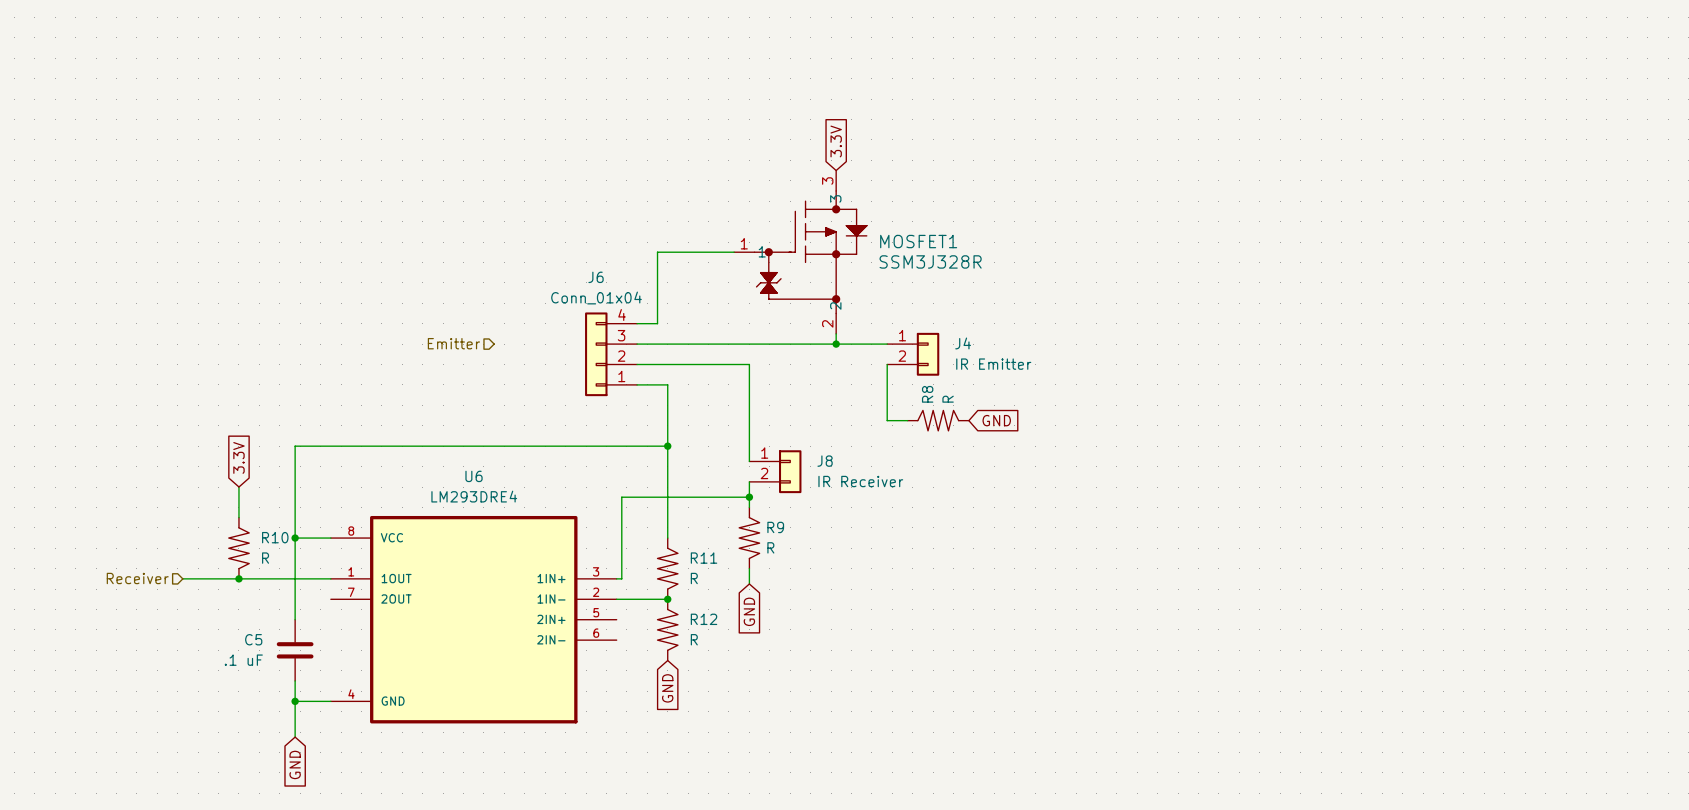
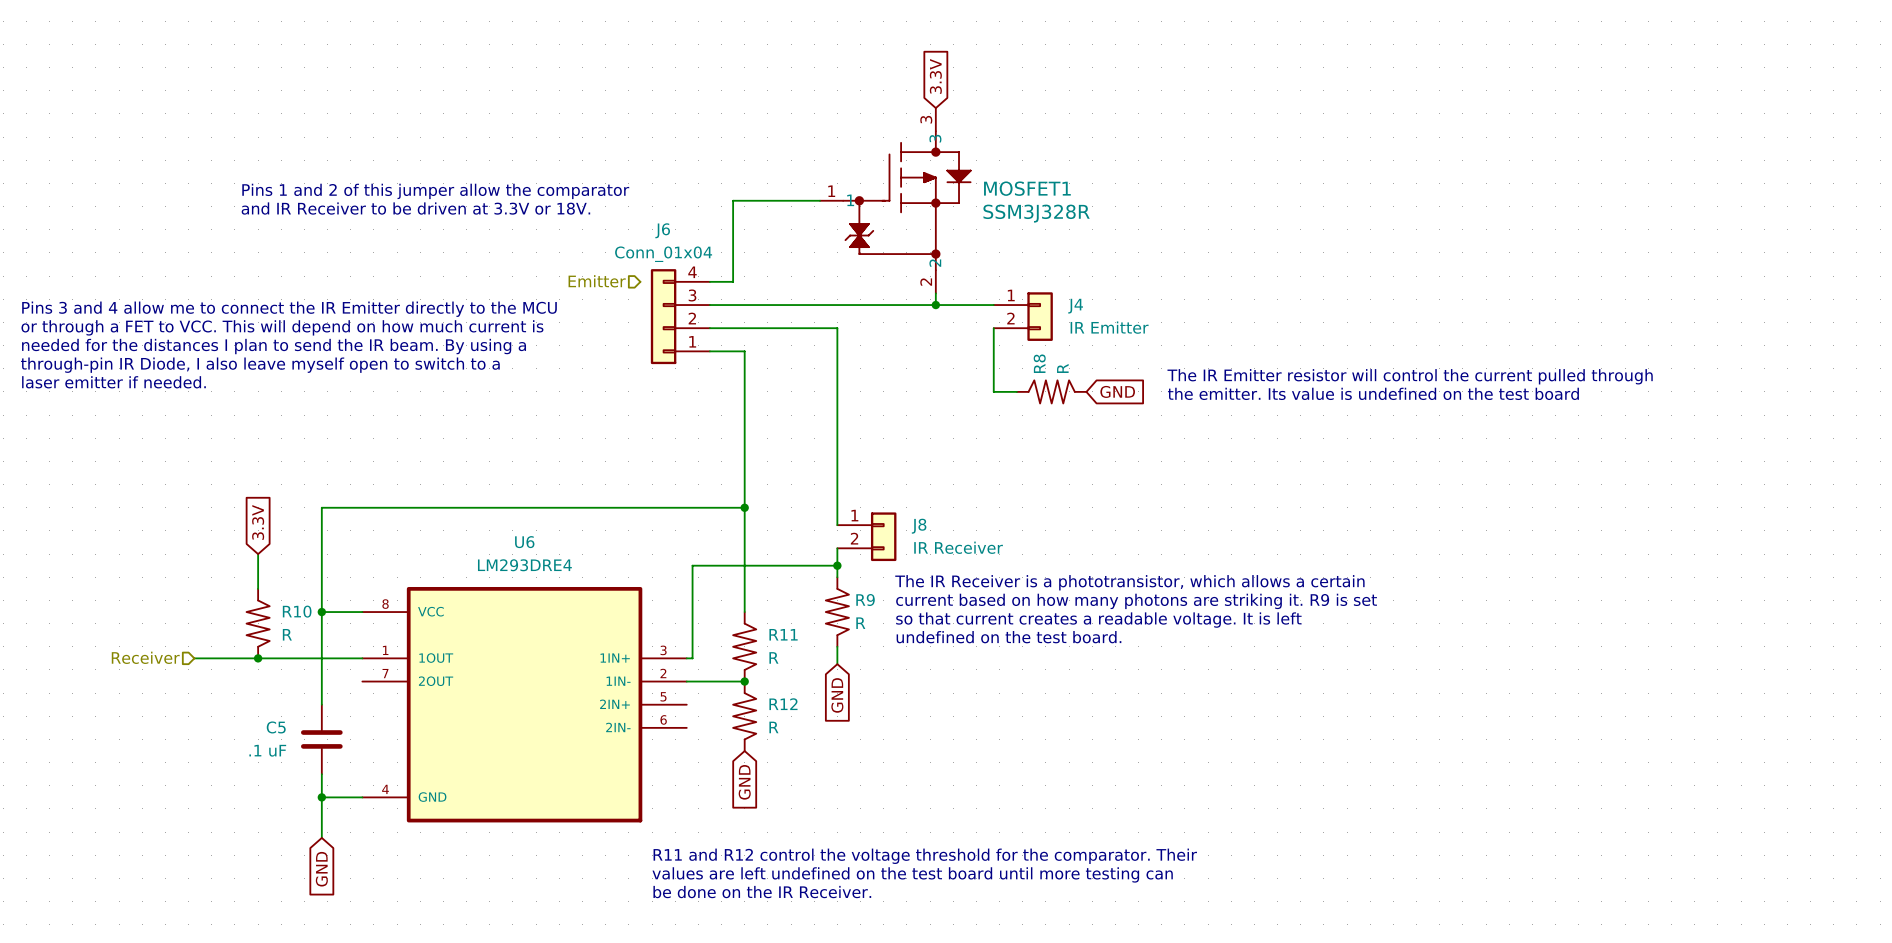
global label position: 3.3V (836, 141) -> 3.3V (935, 76)
text: none -> Pins 1 and 2 of this jumper allow the comparator (435, 191)
text: none -> and IR Receiver to be driven at 3.3V or 18V. (415, 208)
wire: (734, 252) (657, 252) (657, 323) (637, 323) -> (819, 200) (733, 200) (733, 281) (709, 281)
MOSFET1 position: (800, 252) -> (895, 200)
junction: none -> (935, 305)
text: none -> Pins 3 and 4 allow me to connect the IR Emitter directly to the MCU (289, 309)
text: none -> or through a FET to VCC. This will depend on how much current is (282, 327)
text: none -> needed for the distances I plan to send the IR beam. By using a (274, 346)
text: none -> through-pin IR Diode, I also leave myself open to switch to a (260, 365)
text: none -> The IR Emitter resistor will control the current pulled through (1410, 376)
text: none -> laser emitter if needed. (113, 382)
hierarchical label position: Emitter (453, 343) -> Emitter (597, 281)
wire: (637, 344) (887, 344) -> (709, 305) (993, 305)
junction: (836, 344) -> none
text: none -> the emitter. Its value is undefined on the test board (1373, 393)
J6 position: (611, 354) -> (680, 316)
J4 position: (913, 354) -> (1023, 316)
wire: (637, 364) (749, 364) -> (709, 328) (837, 328) (837, 415)
wire: (887, 364) (887, 420) (907, 420) -> (993, 328) (993, 391) (1016, 391)
wire: (637, 384) (667, 384) -> (709, 351) (744, 351) (744, 438)
R8 position: (938, 420) -> (1051, 391)
global label position: GND (996, 420) -> GND (1117, 391)
text: none -> The IR Receiver is a phototransistor, which allows a certain (1129, 582)
text: none -> current based on how many photons are striking it. R9 is set (1136, 601)
text: none -> so that current creates a readable voltage. It is left (1098, 620)
text: none -> undefined on the test board. (1008, 637)
text: none -> R11 and R12 control the voltage threshold for the comparator. Their (925, 856)
text: none -> values are left undefined on the test board until more testing can (912, 874)
text: none -> be done on the IR Receiver. (762, 892)

